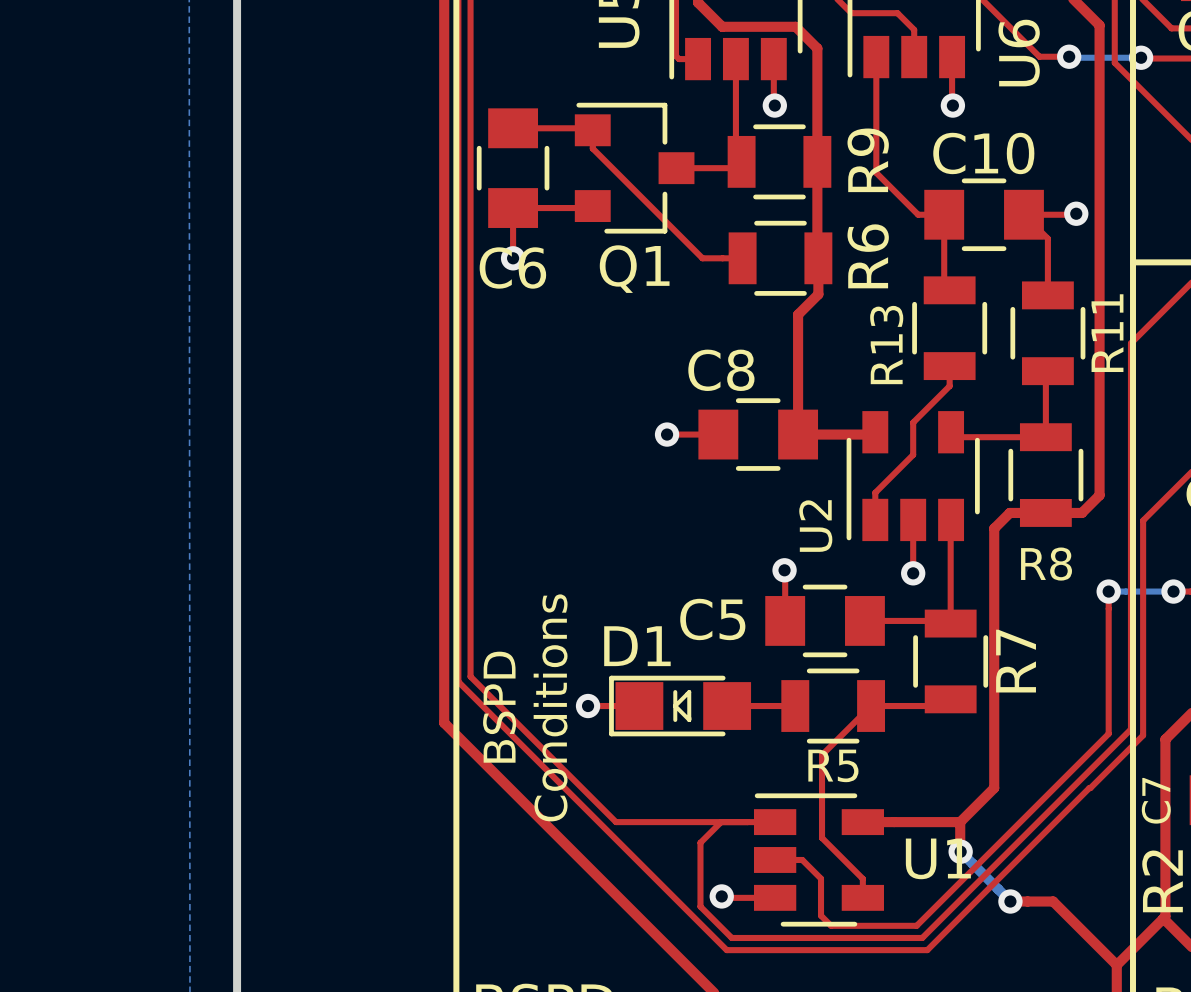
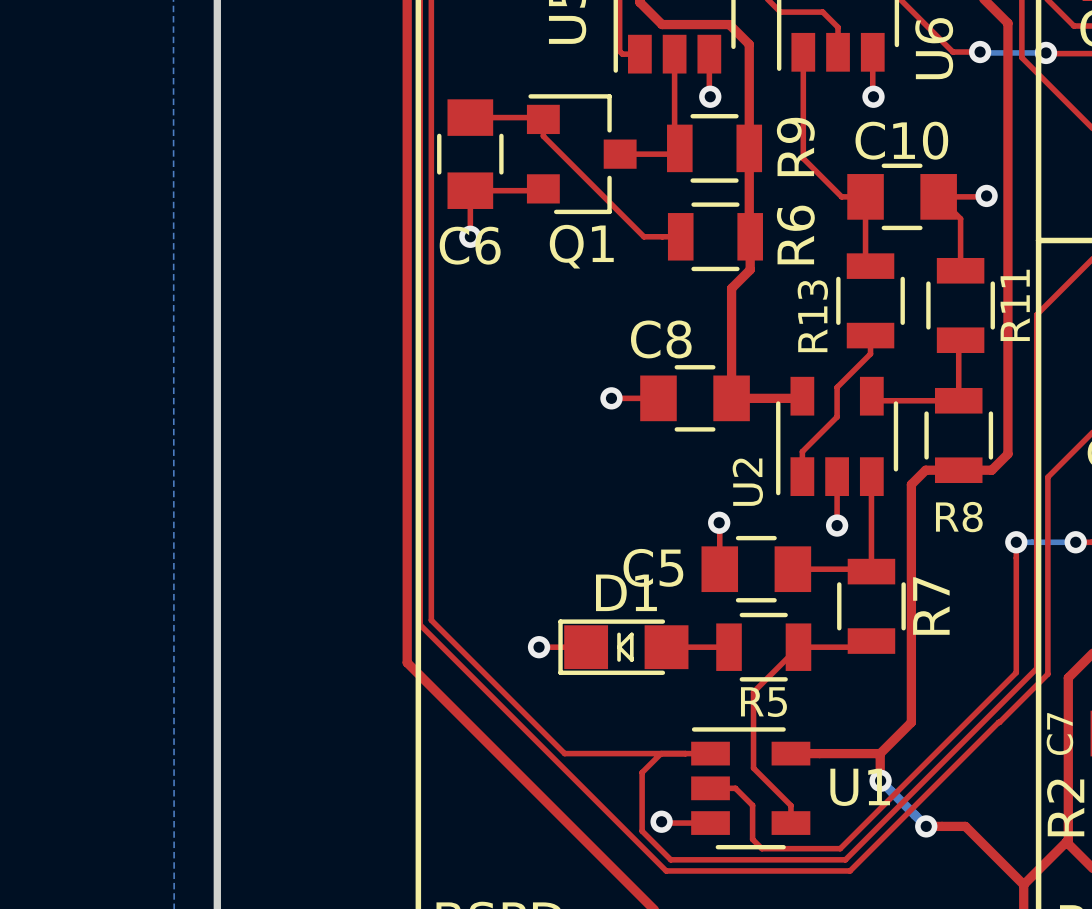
D1 name position: D1 (637, 646) -> D1 (626, 592)
text: BSPD (499, 707) -> none
text: Conditions (550, 707) -> none

